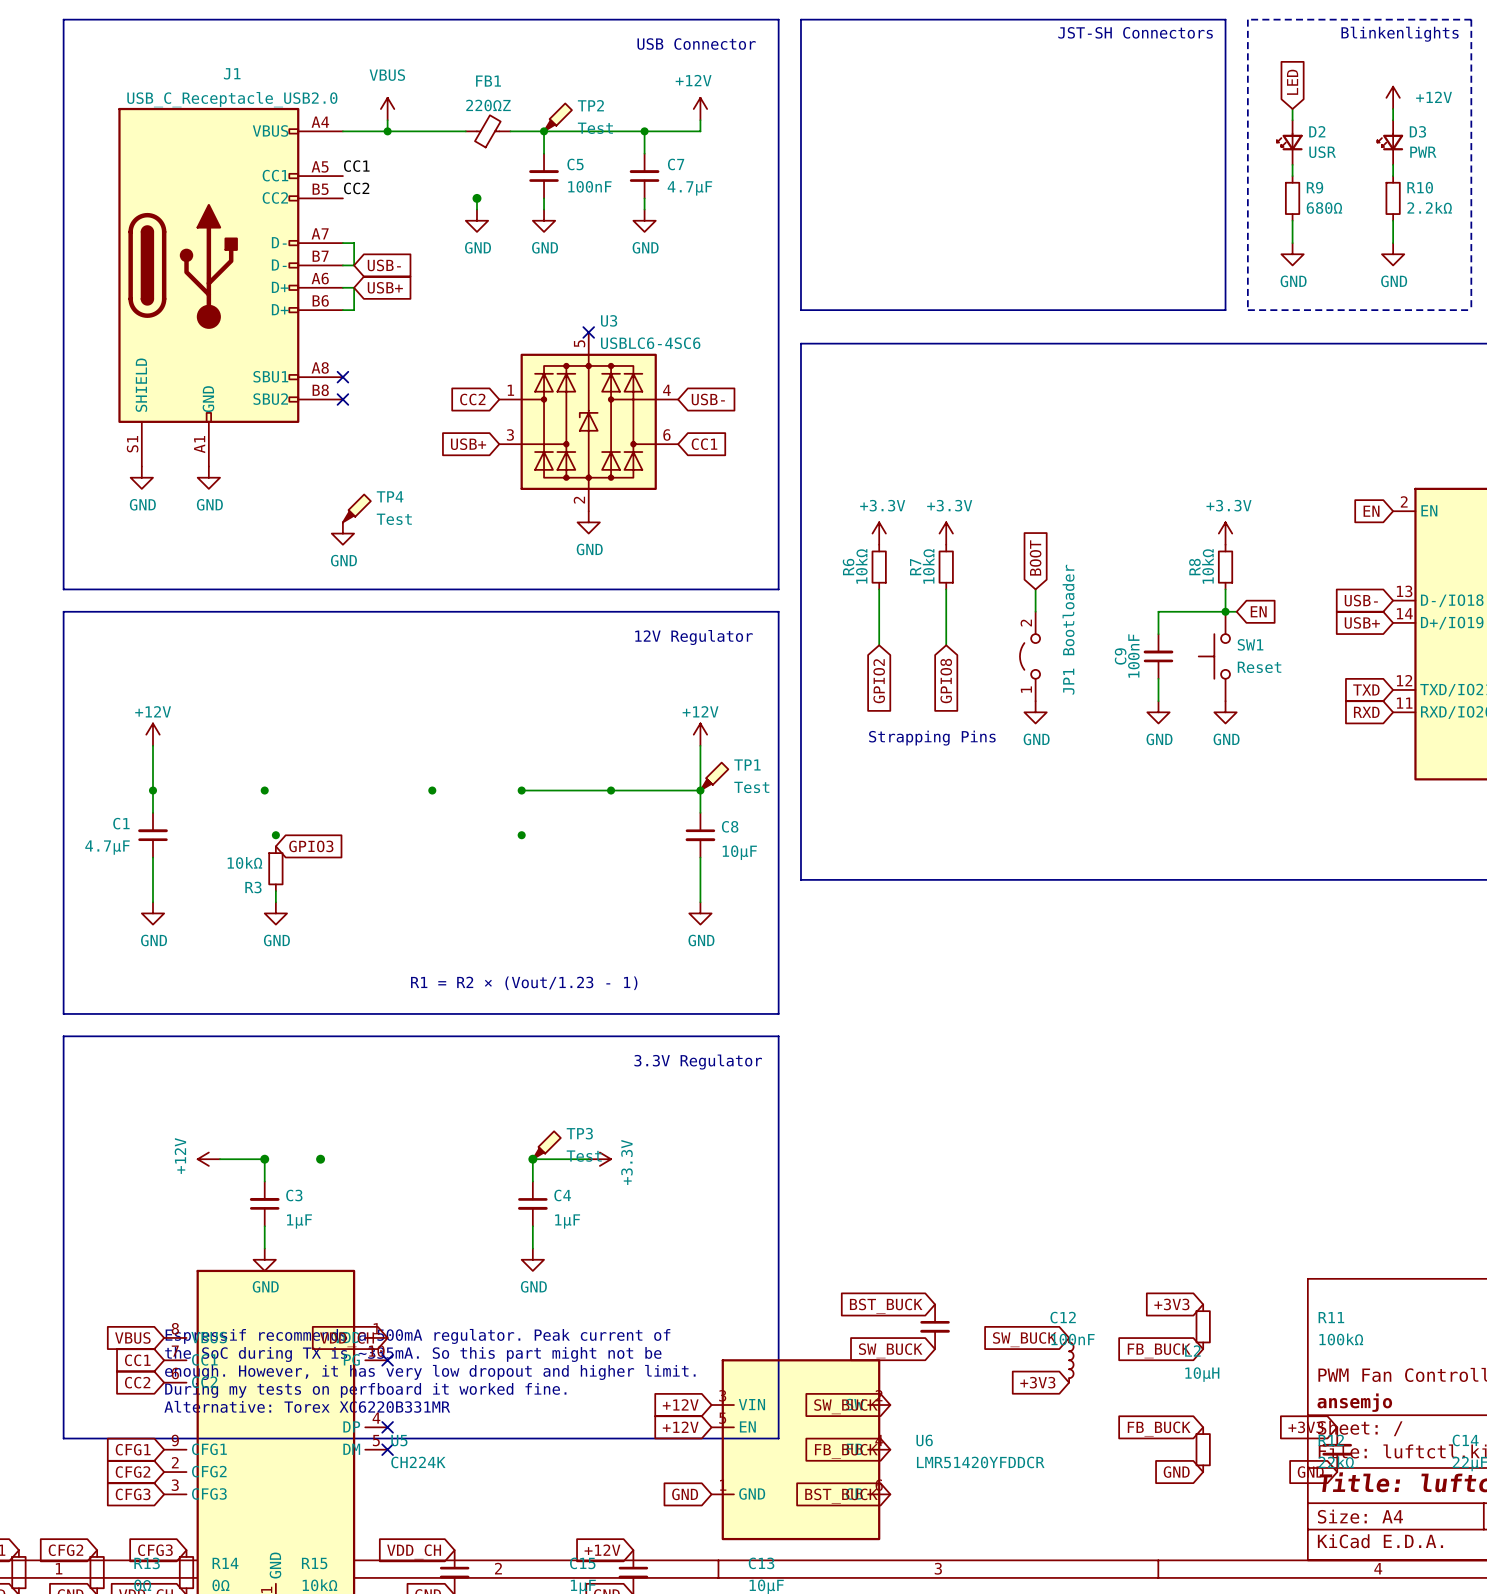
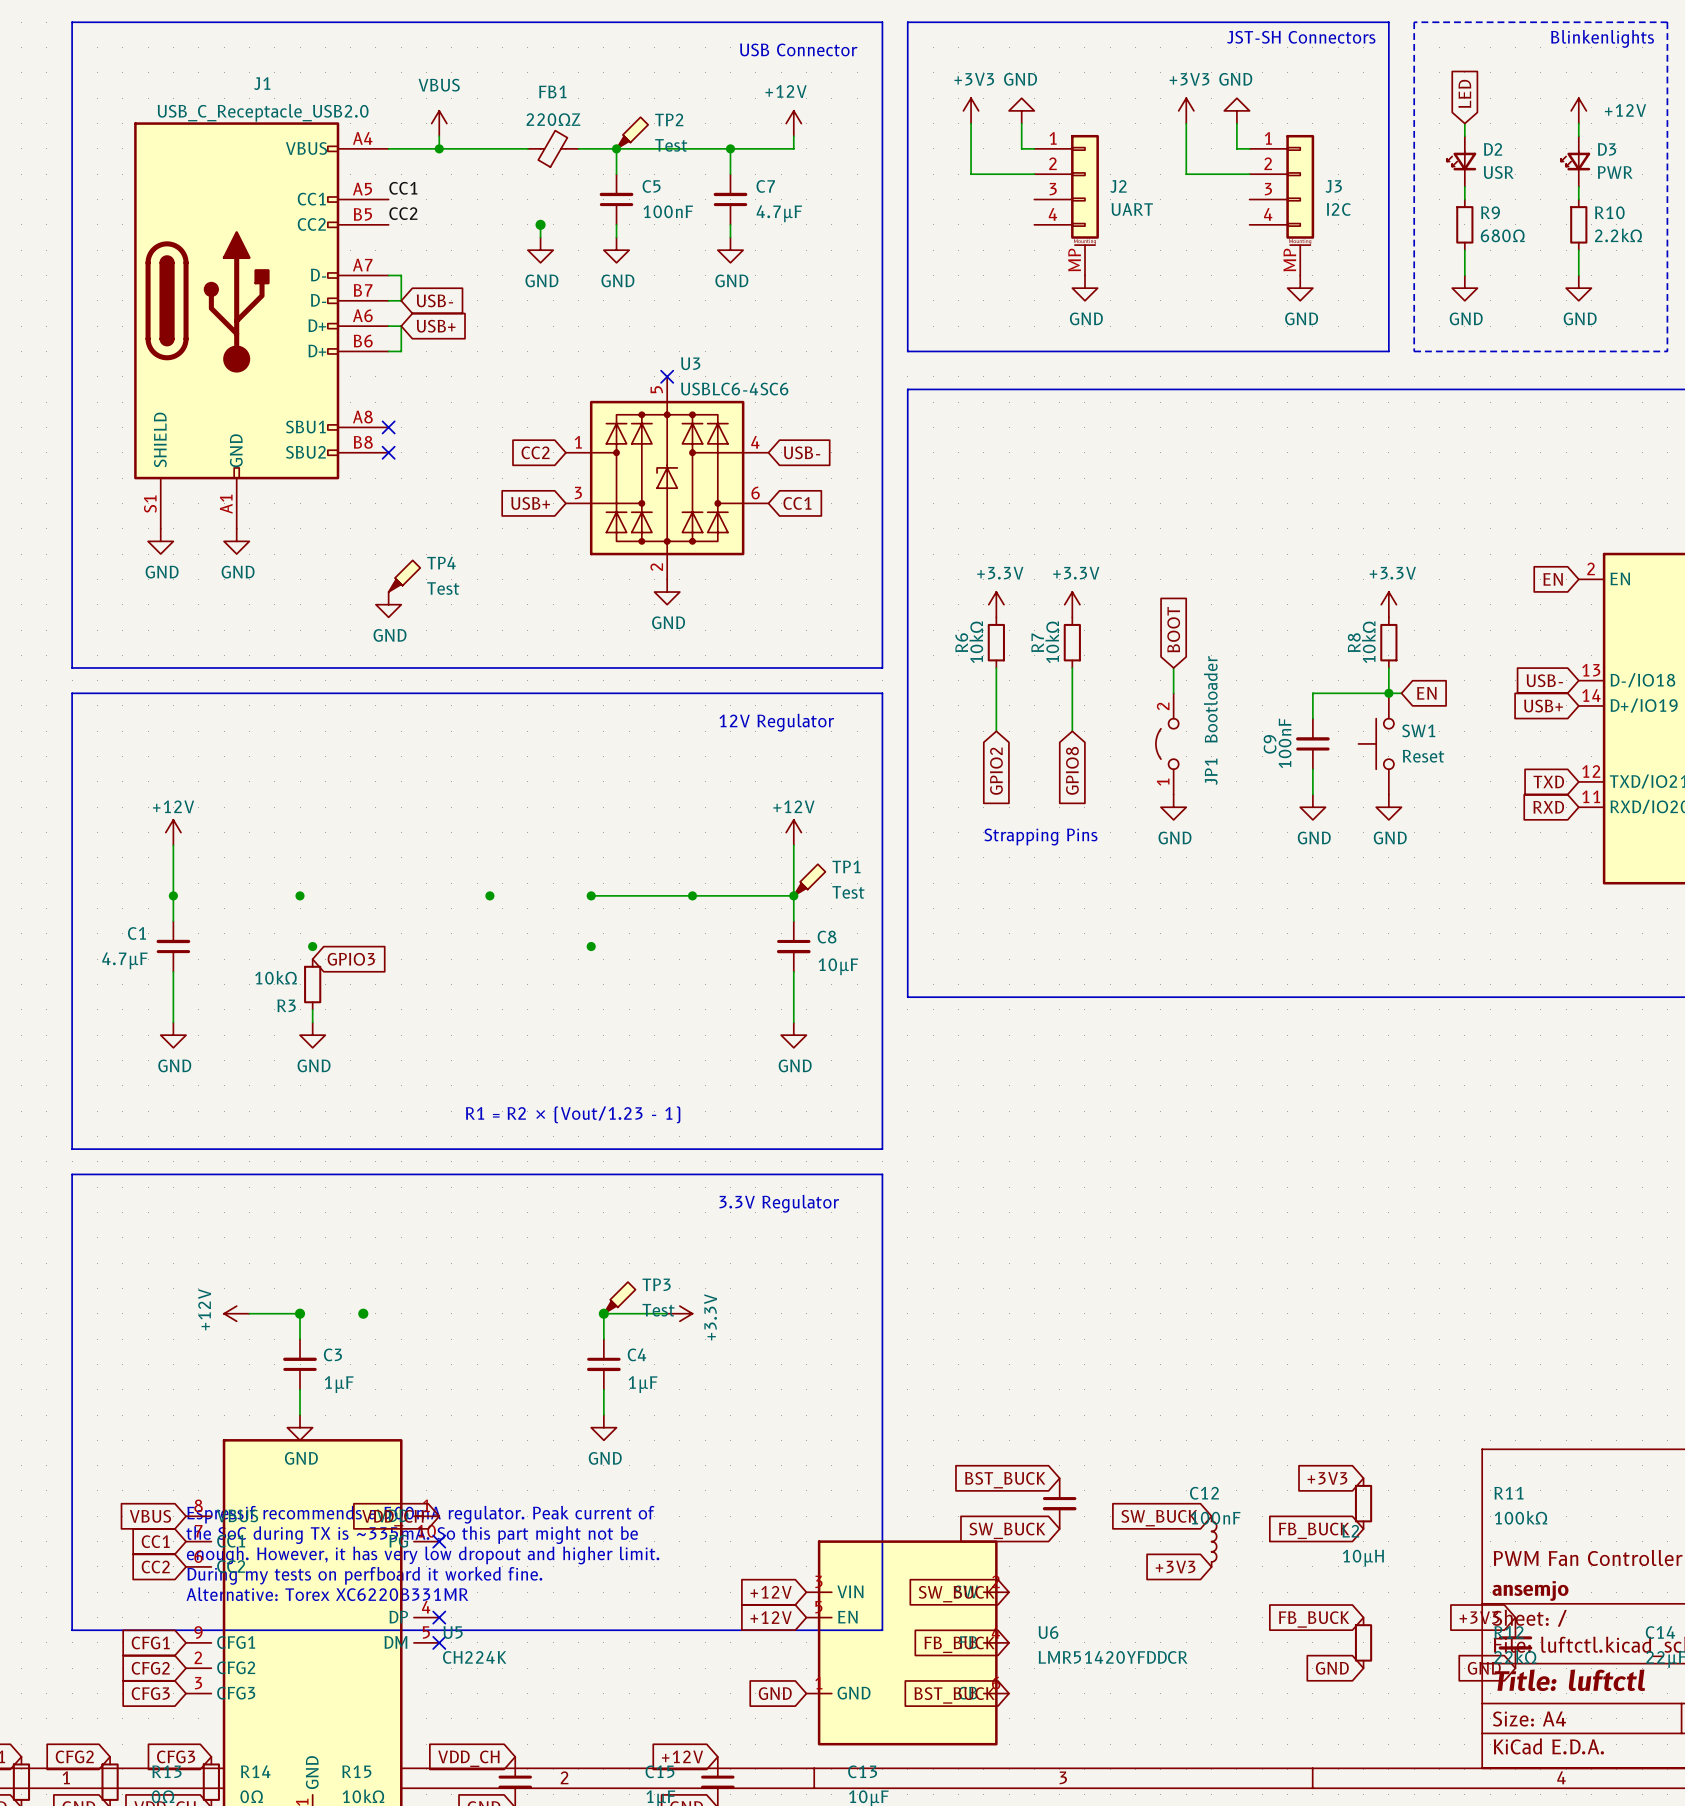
power symbol: none -> +3V3 (971, 110)
power symbol: none -> GND (1021, 110)
power symbol: none -> +3V3 (1186, 110)
power symbol: none -> GND (1236, 110)
wire: none -> (971, 123) (971, 174) (1034, 174)
wire: none -> (1021, 123) (1021, 148) (1034, 148)
wire: none -> (1186, 123) (1186, 174) (1249, 174)
wire: none -> (1236, 123) (1236, 148) (1249, 148)
J2: none -> UART (1066, 205)
J3: none -> I2C (1281, 205)
power symbol: none -> GND (1084, 288)
power symbol: none -> GND (1300, 288)

